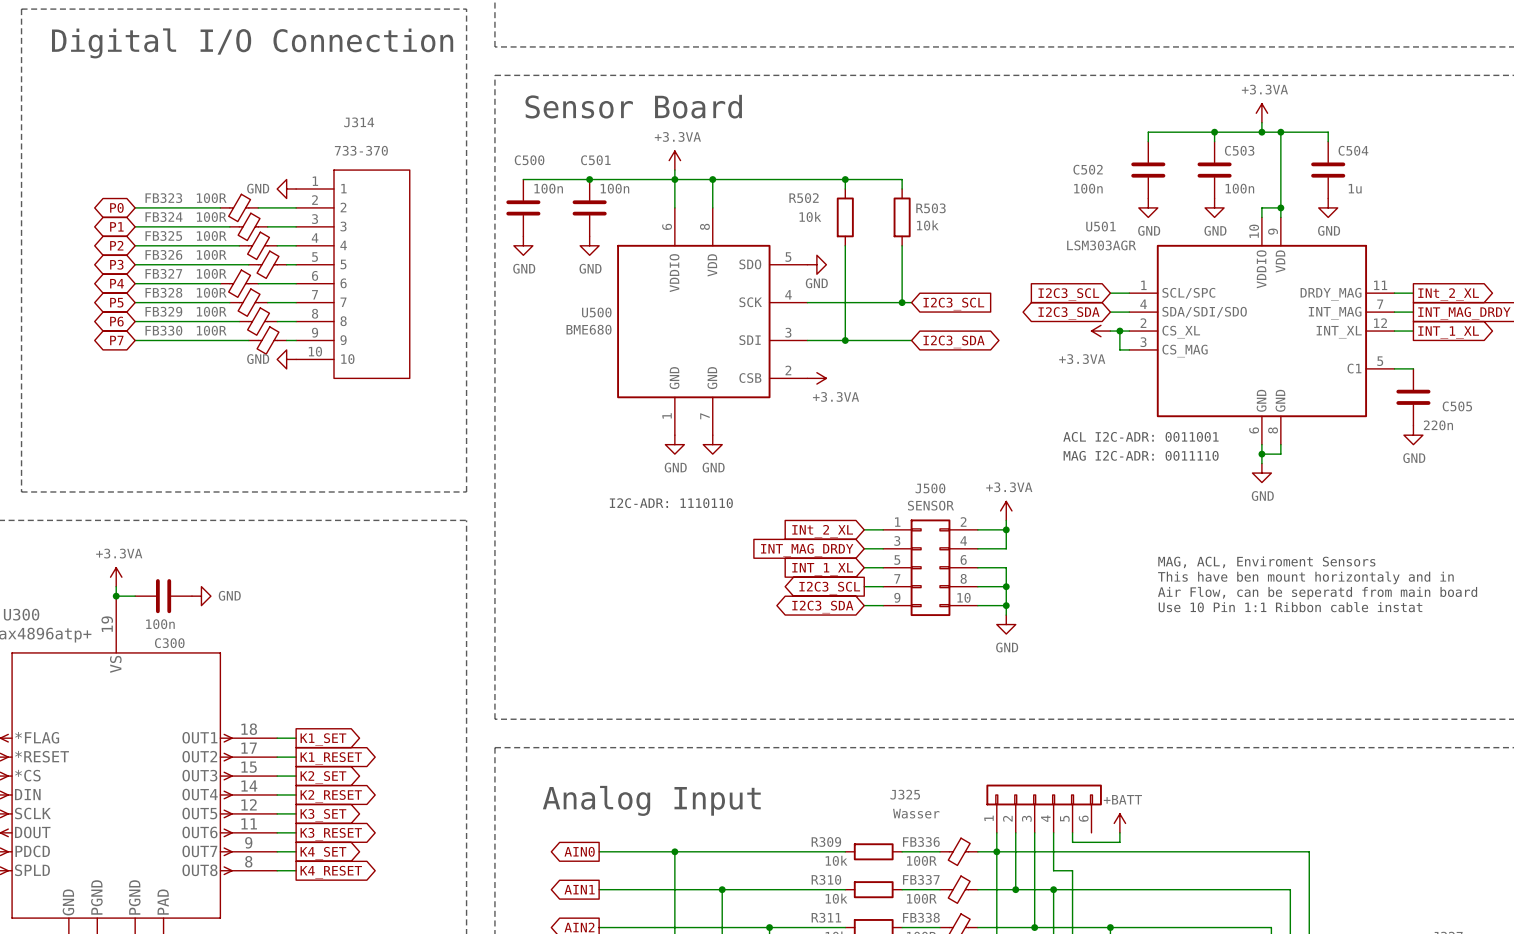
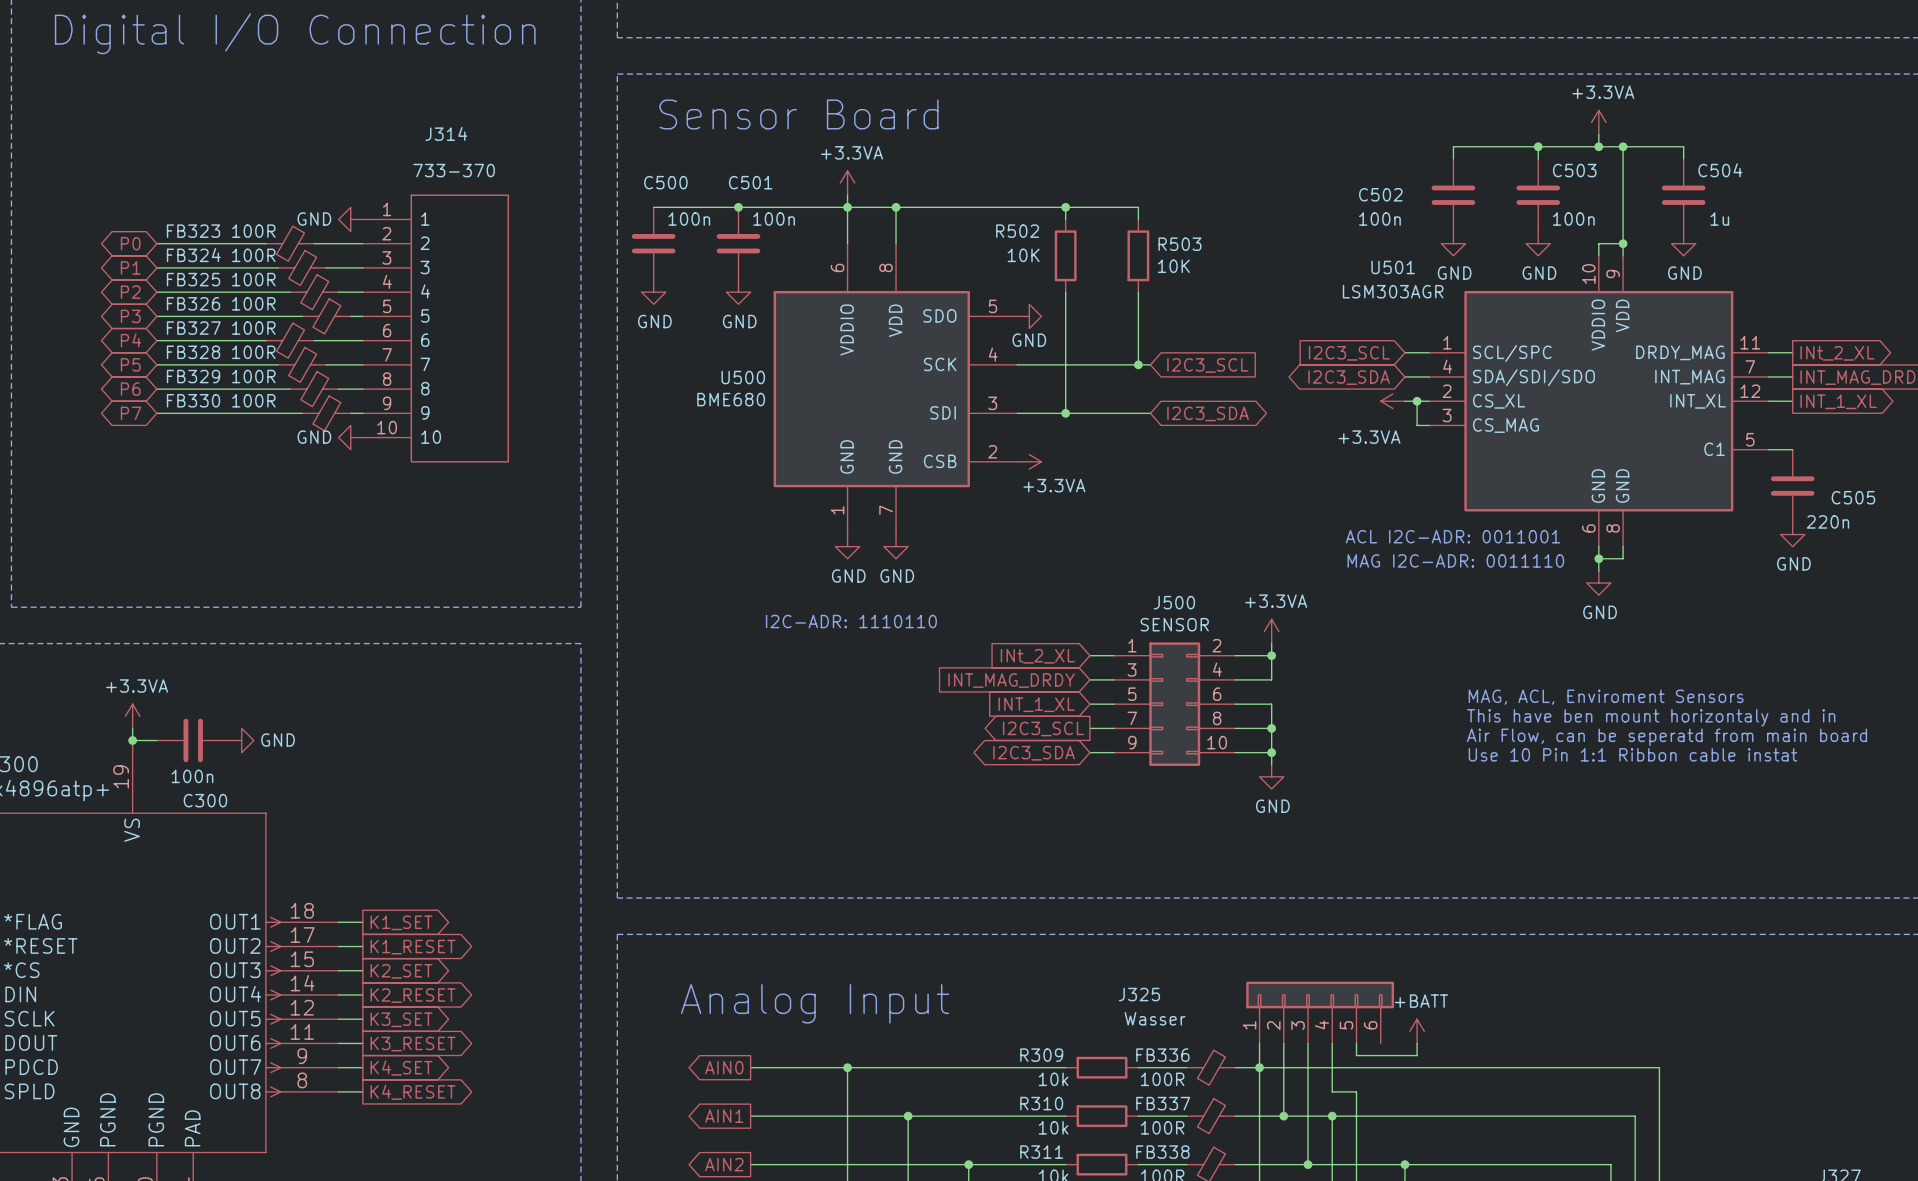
R502 value: 10k (810, 216) -> 10K (1023, 255)
R503 value: 10k (927, 225) -> 10K (1173, 266)

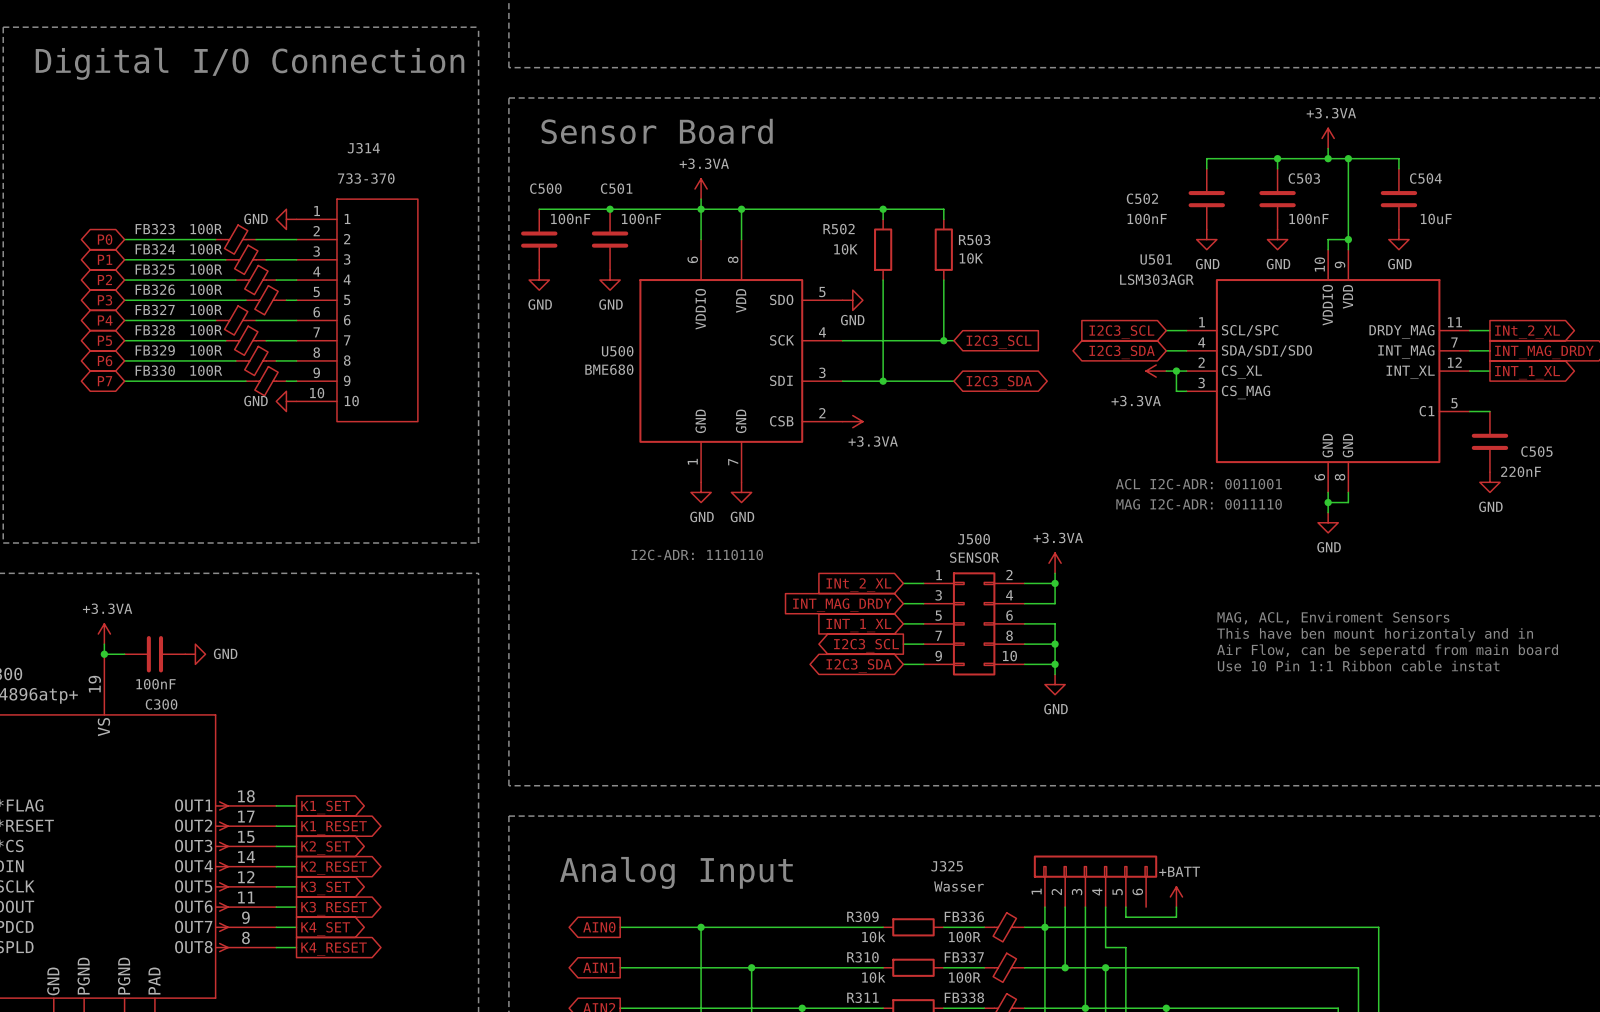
C500 value: 100n (689, 219) -> 100nF (570, 218)
C501 value: 100n (774, 219) -> 100nF (641, 218)
C502 value: 100n (1379, 219) -> 100nF (1147, 218)
C503 value: 100n (1573, 219) -> 100nF (1308, 218)
C504 value: 1u (1719, 219) -> 10uF (1436, 218)
C505 value: 220n (1828, 521) -> 220nF (1521, 471)
C300 value: 100n (192, 776) -> 100nF (156, 684)

